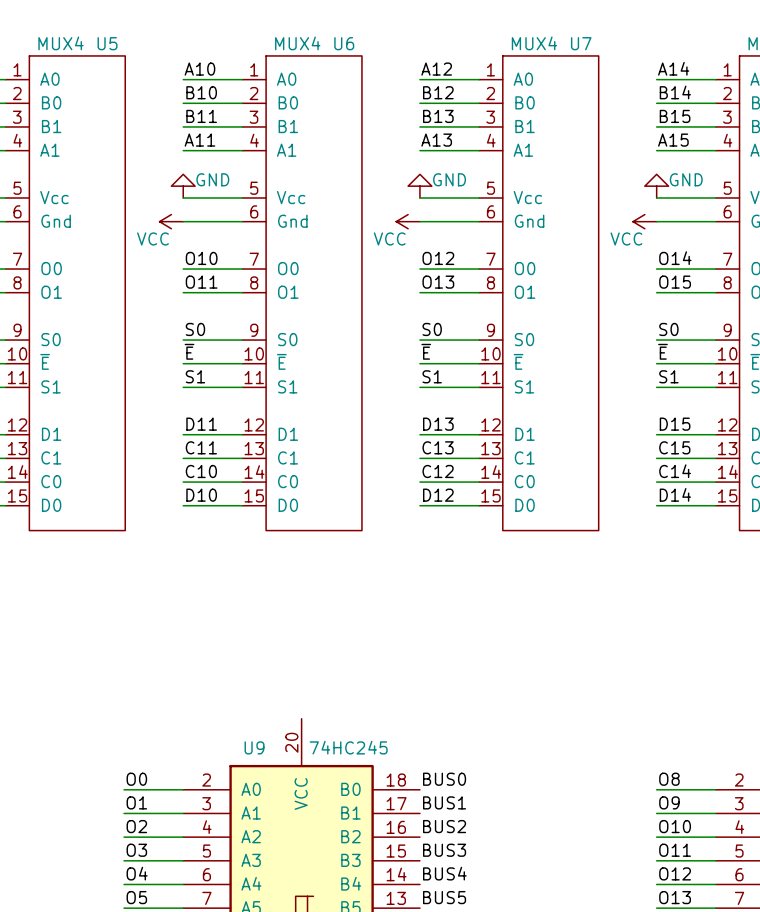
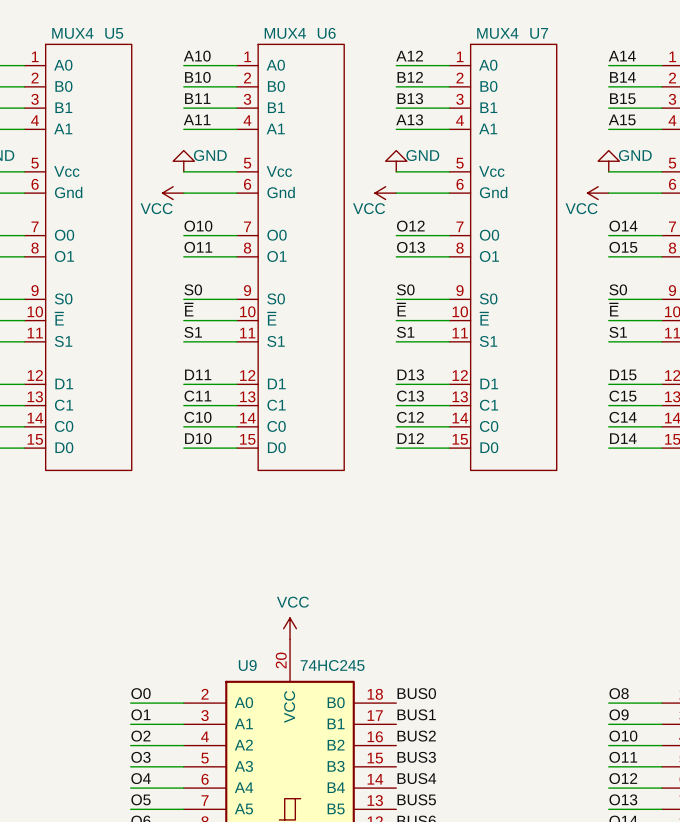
power symbol: none -> VCC (290, 628)

